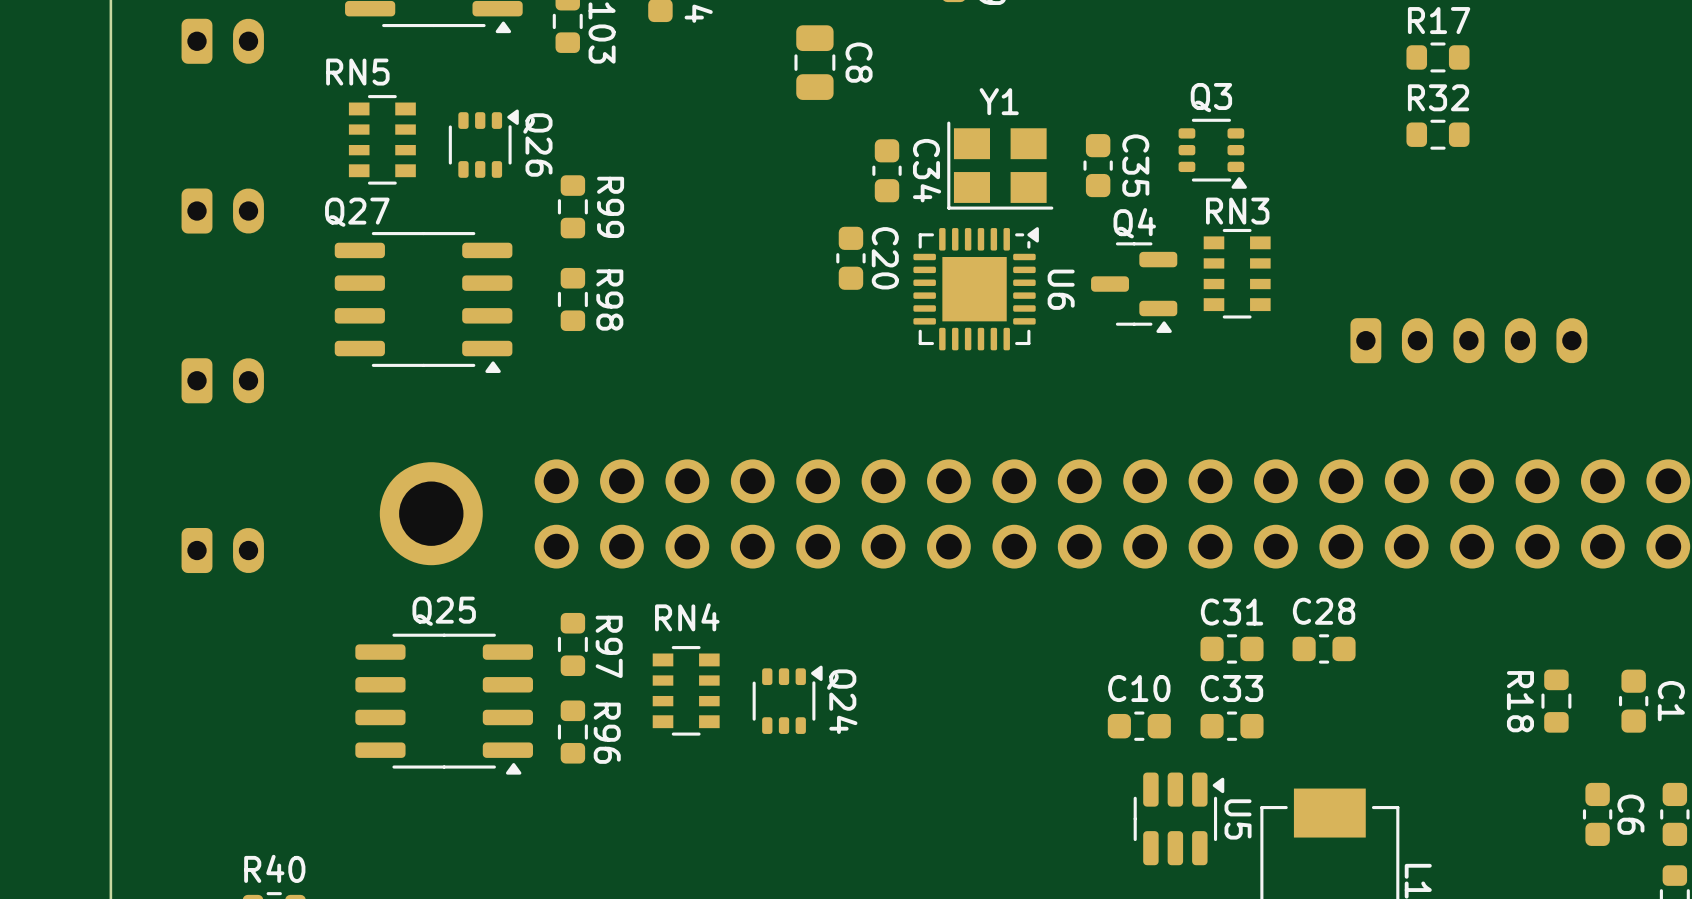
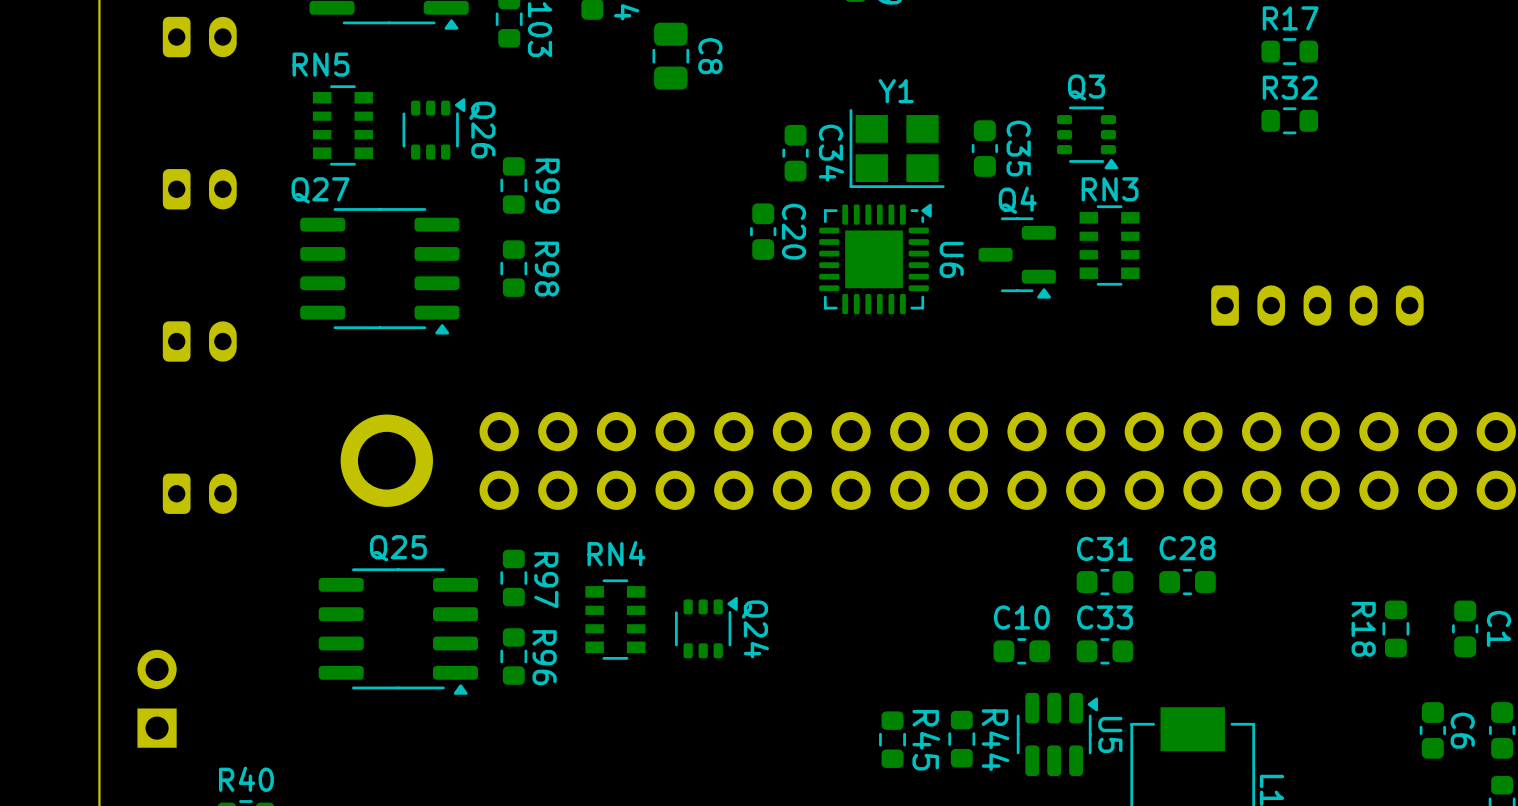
C8 position: (814, 62) -> (670, 56)
part: none -> (157, 698)
R45: none -> (892, 739)
R44: none -> (961, 739)

